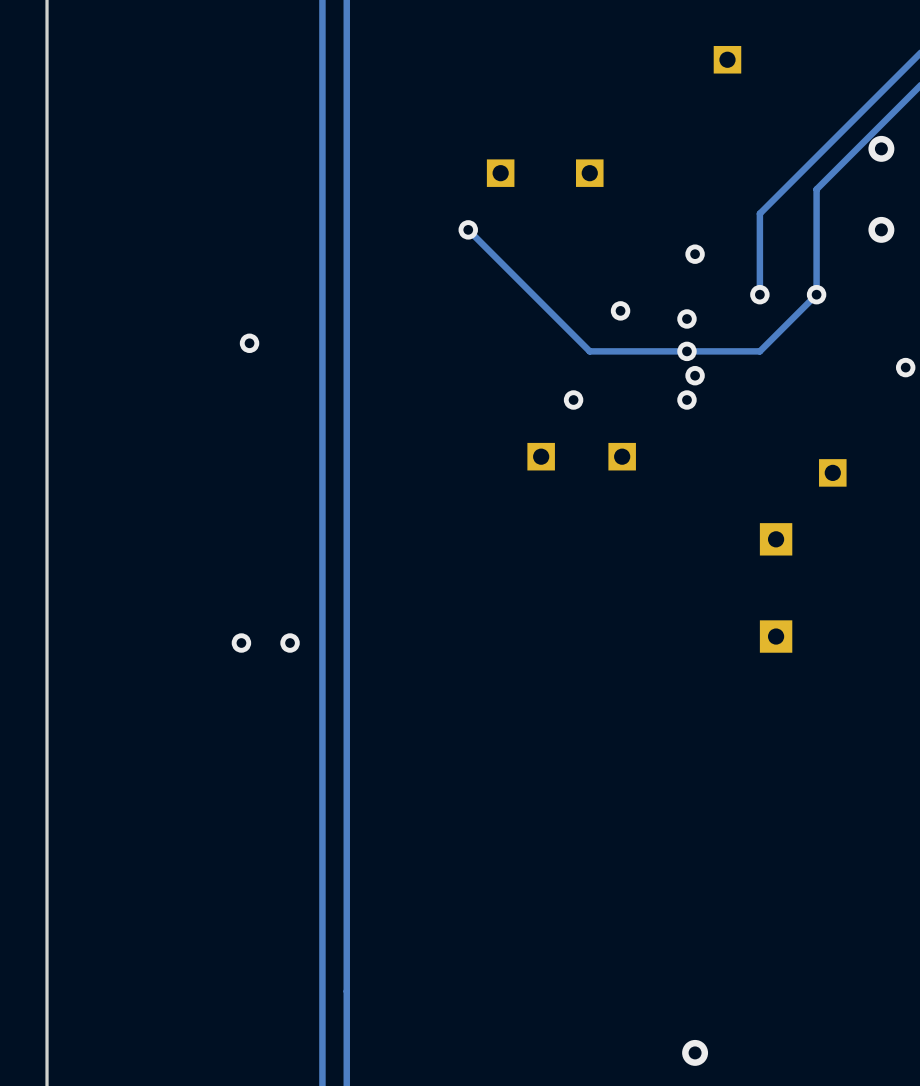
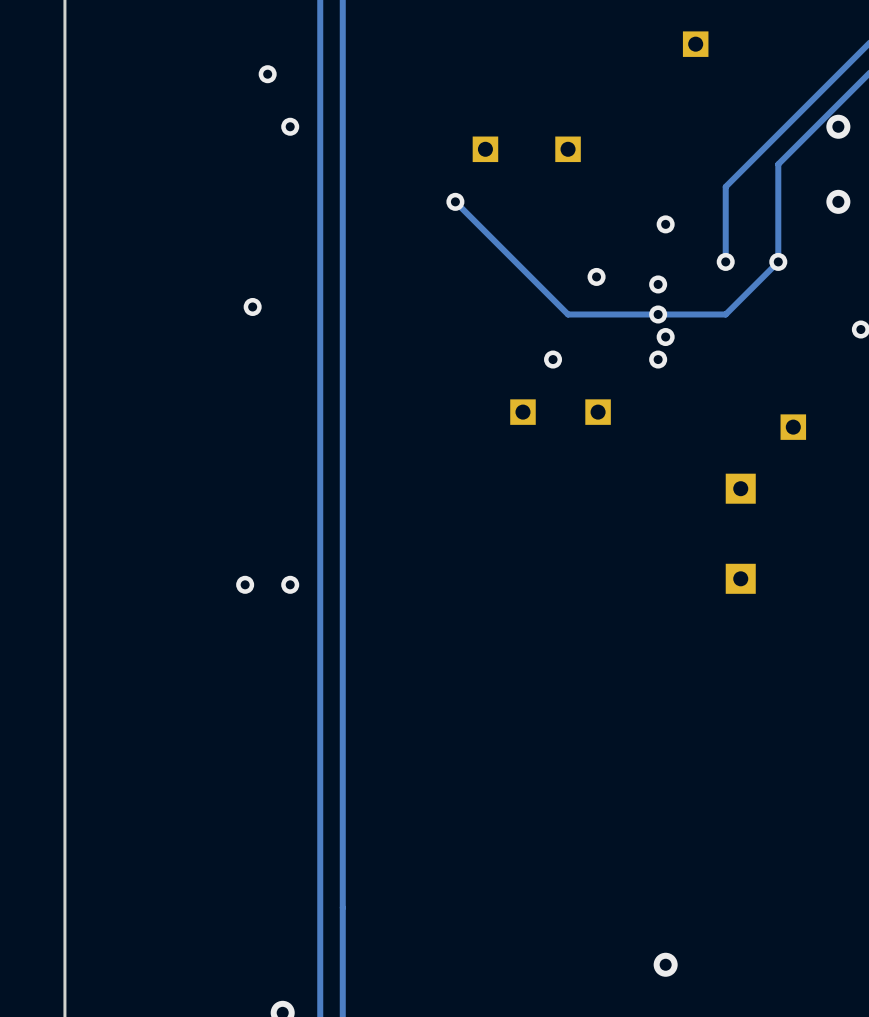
via: none -> (267, 74)
via: none -> (290, 126)

